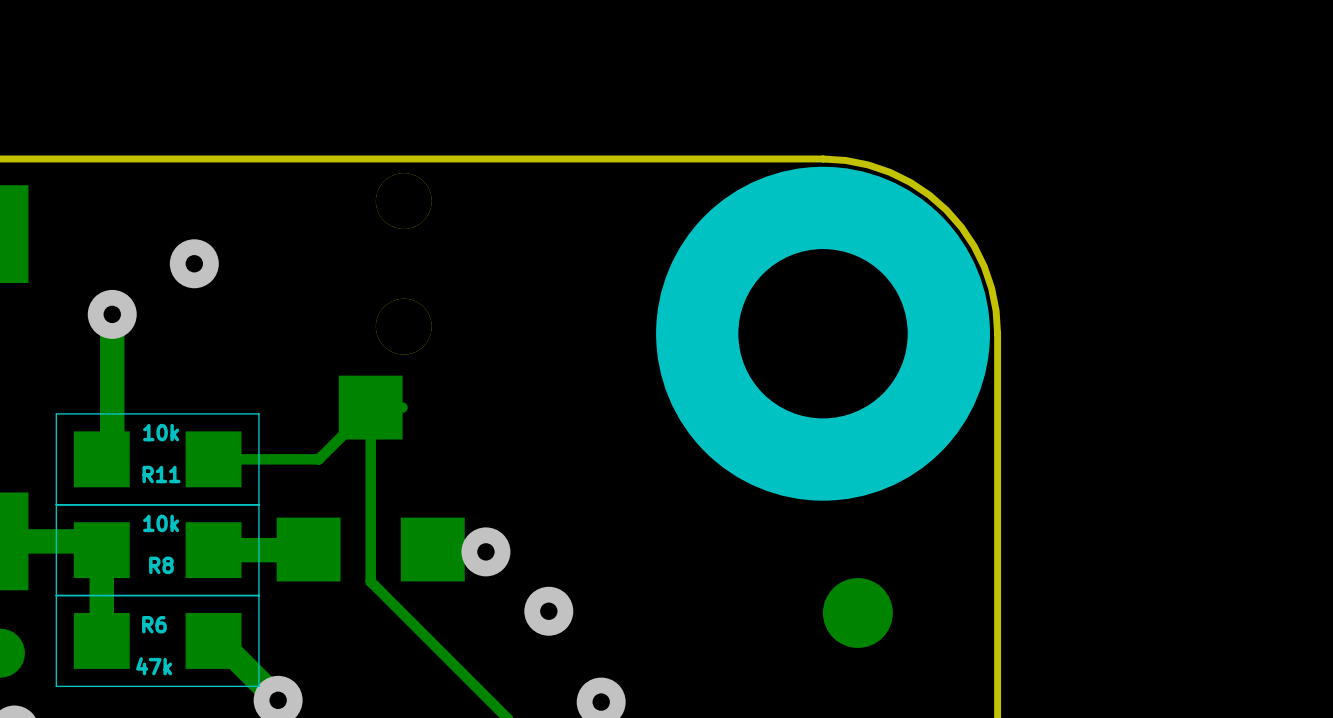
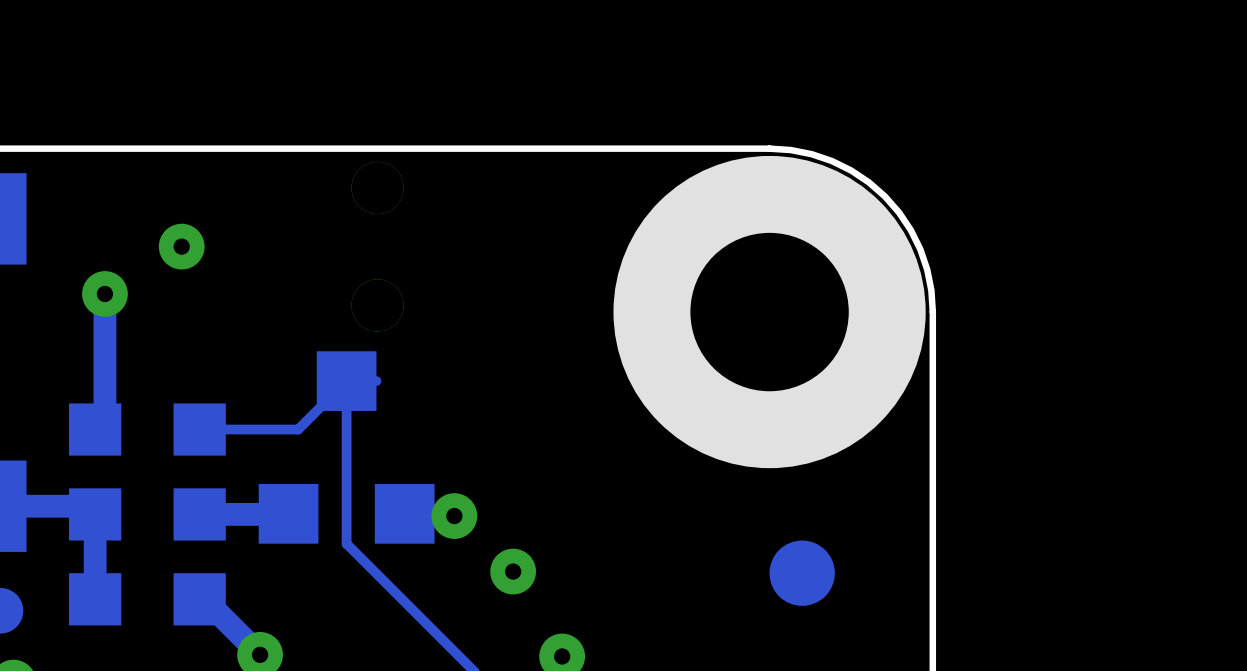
R11: 10k (157, 459) -> none
R8: 10k (157, 550) -> none
R6: 47k (157, 640) -> none

